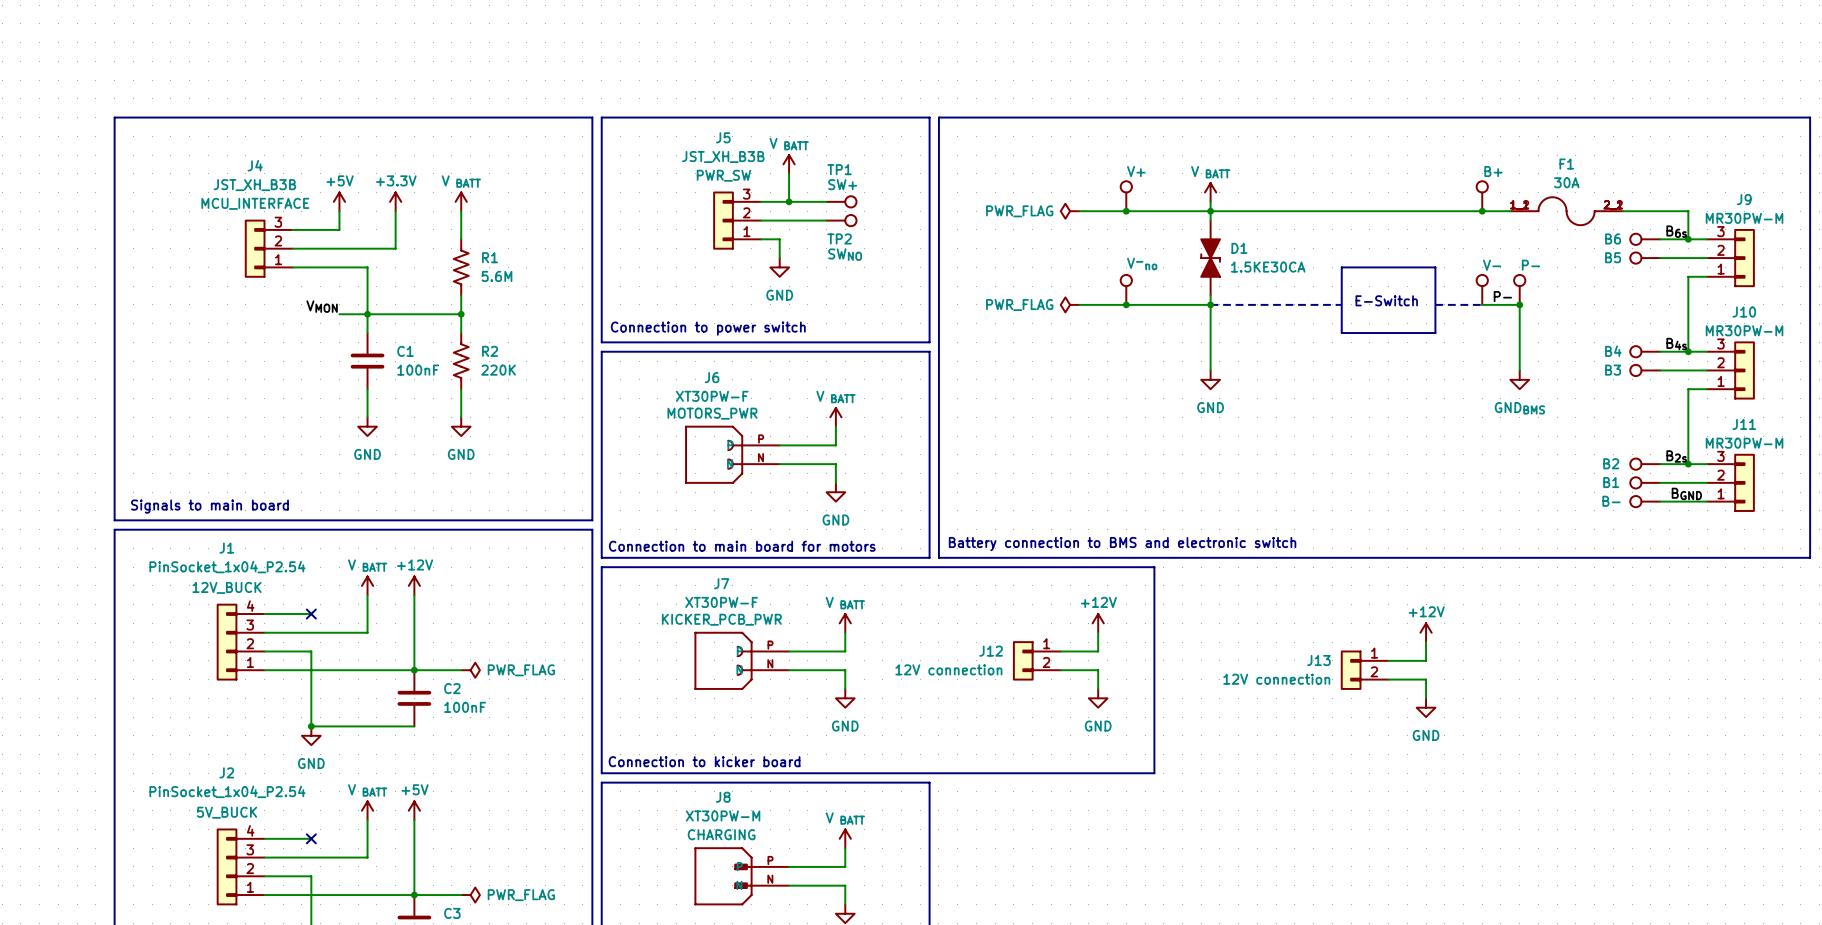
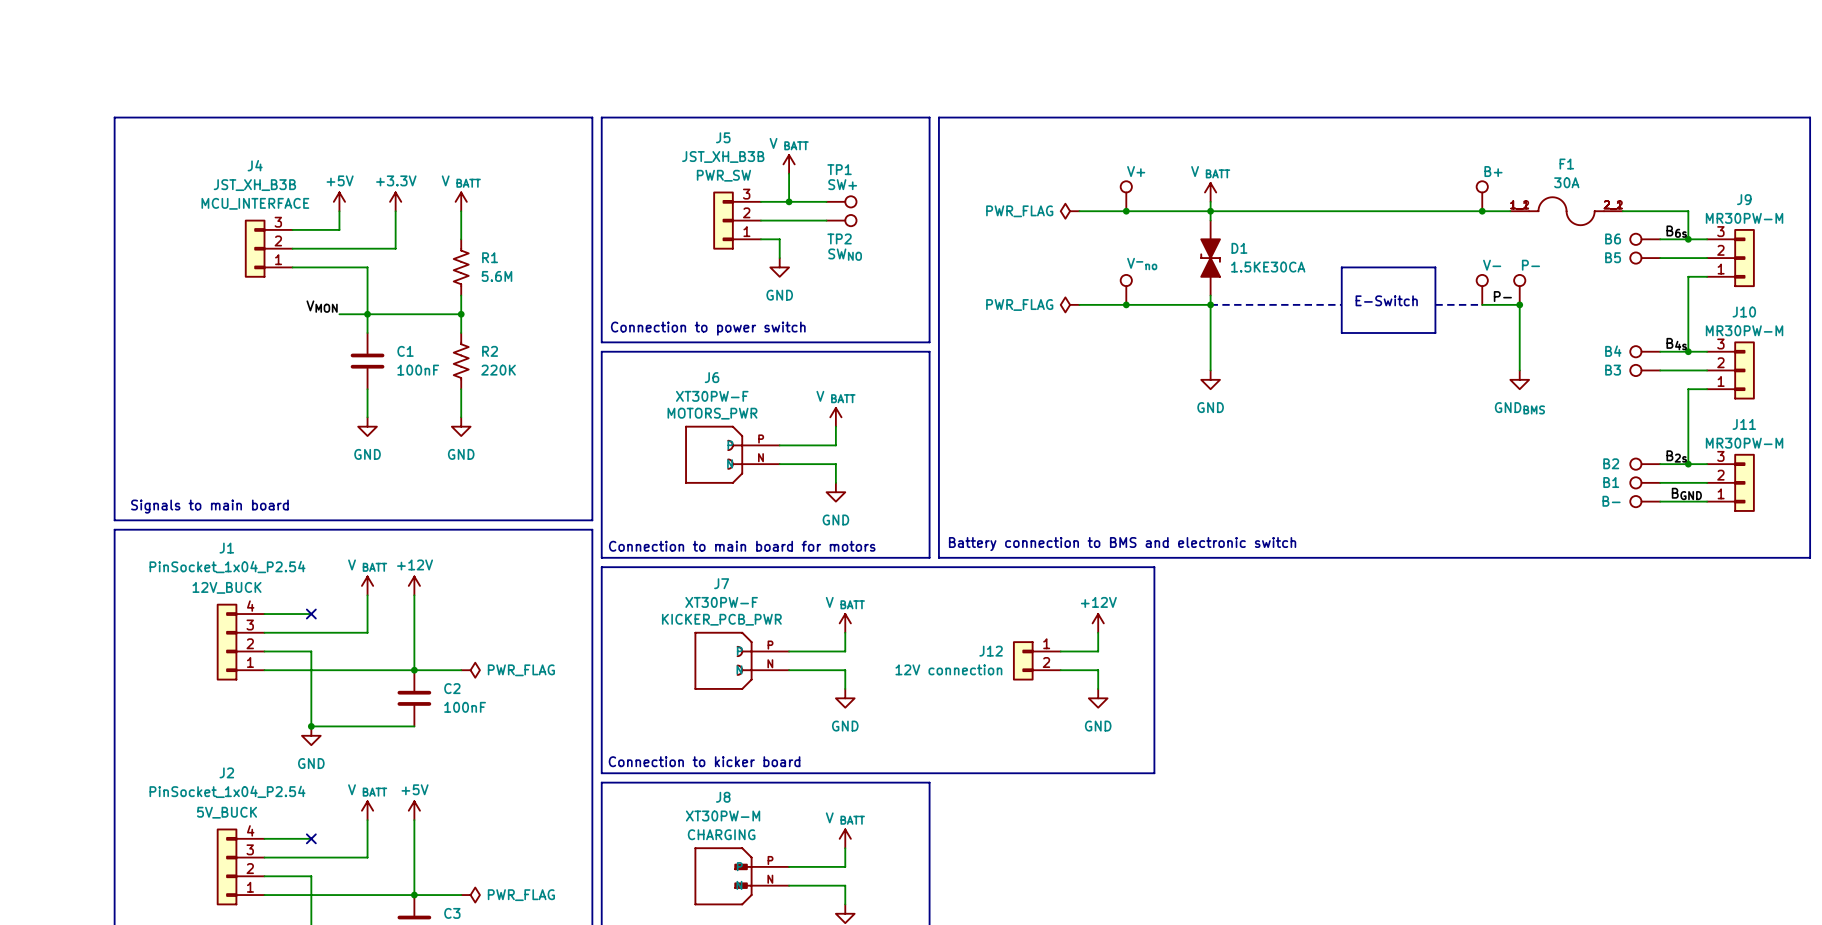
power symbol: +12V (1426, 632) -> none
wire: (1426, 642) (1426, 660) (1388, 660) -> none
J13: 12V connection (1364, 670) -> none
wire: (1388, 679) (1426, 679) (1426, 698) -> none
power symbol: GND (1426, 707) -> none

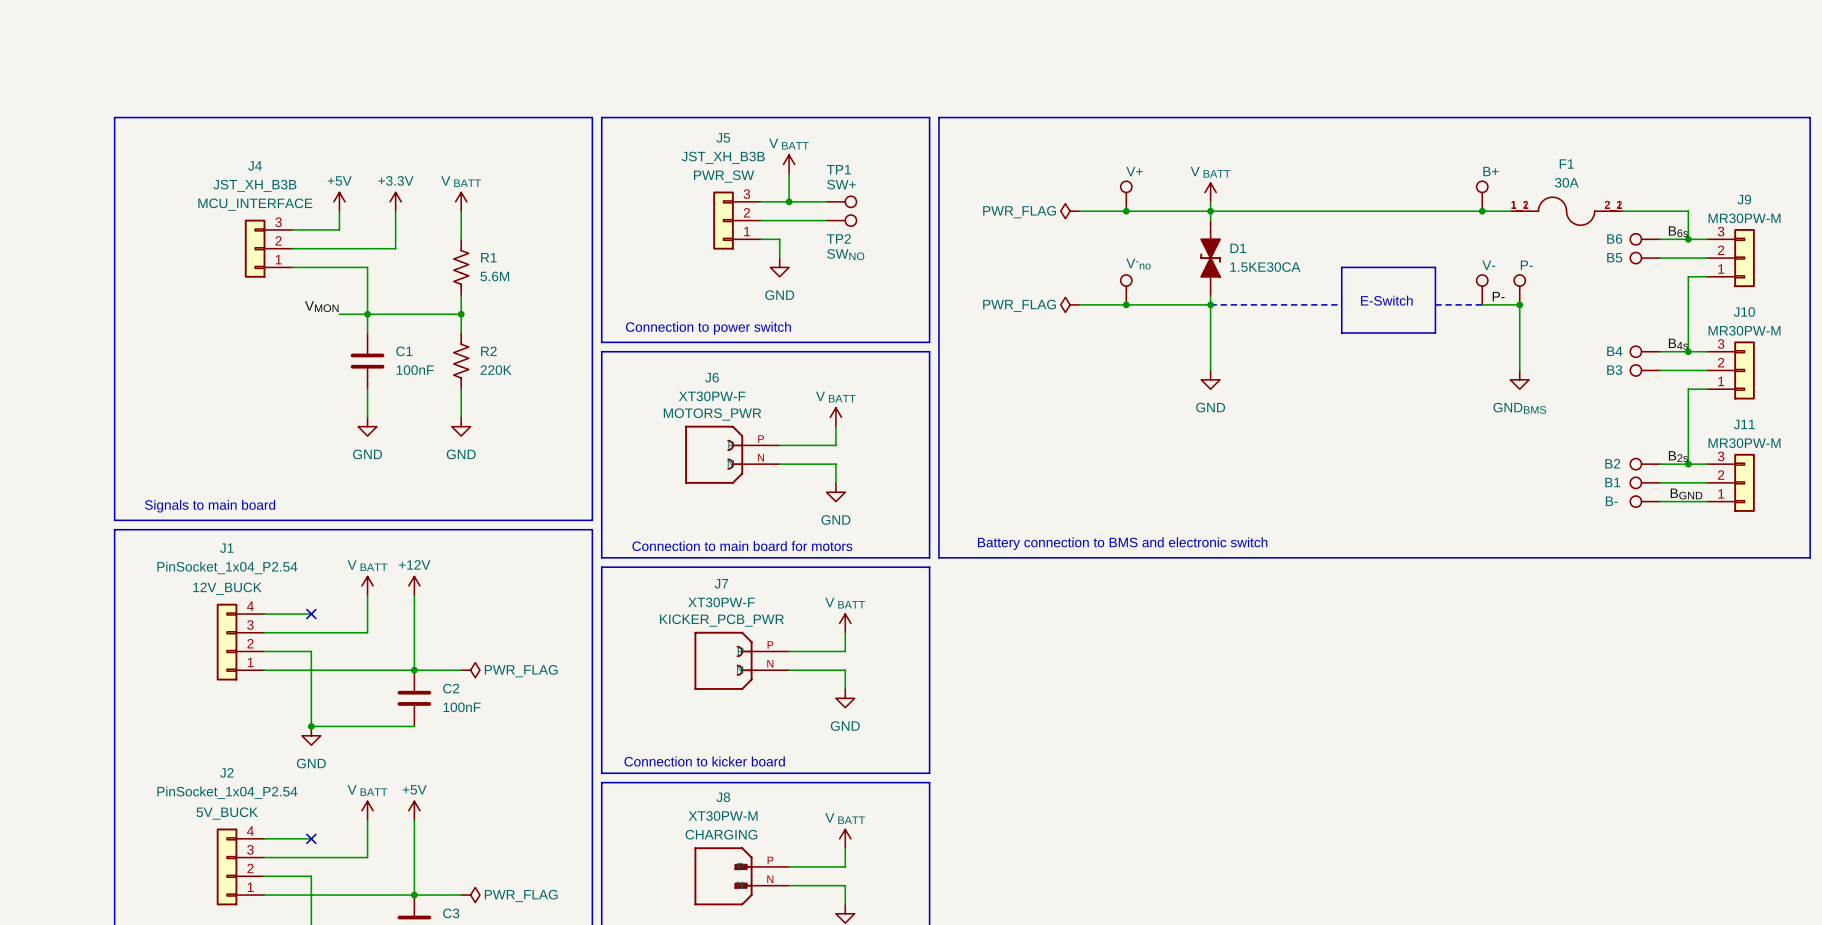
line: (929, 567) (1154, 567) (1154, 773) (929, 773) -> (929, 567) (929, 773)
power symbol: +12V (1098, 623) -> none
wire: (1098, 632) (1098, 651) (1060, 651) -> none
J12: 12V connection (1036, 660) -> none
wire: (1060, 670) (1098, 670) (1098, 688) -> none
power symbol: GND (1098, 698) -> none

